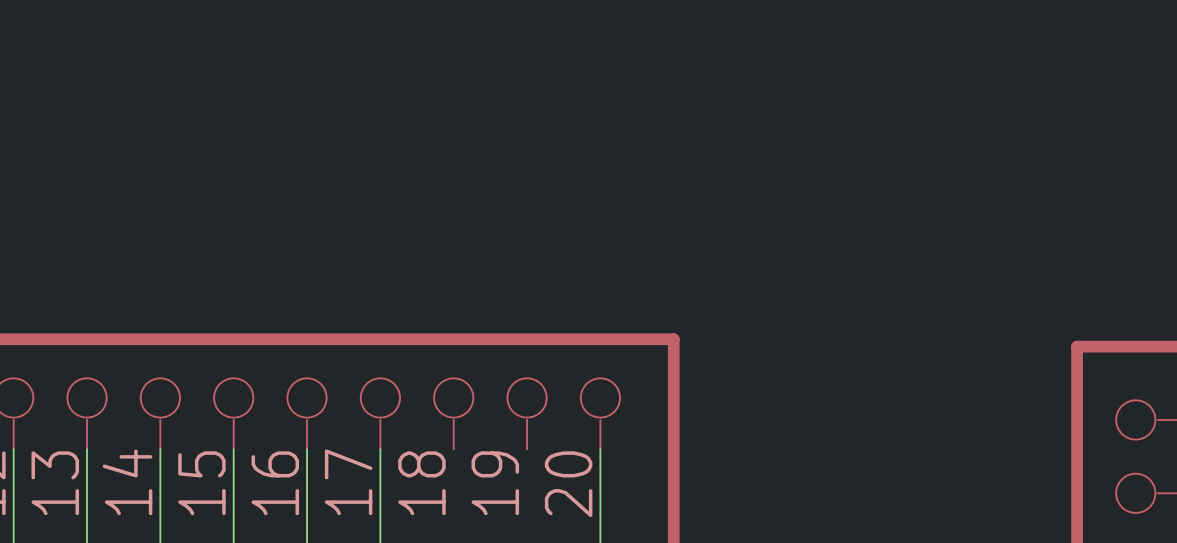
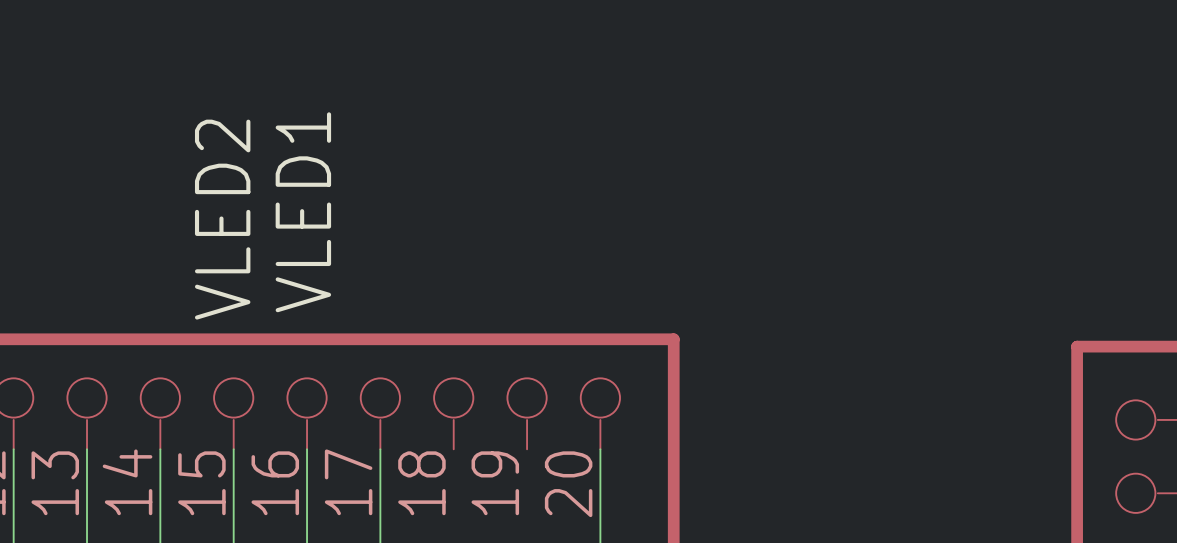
label: none -> VLED1 (303, 212)
label: none -> VLED2 (222, 219)

